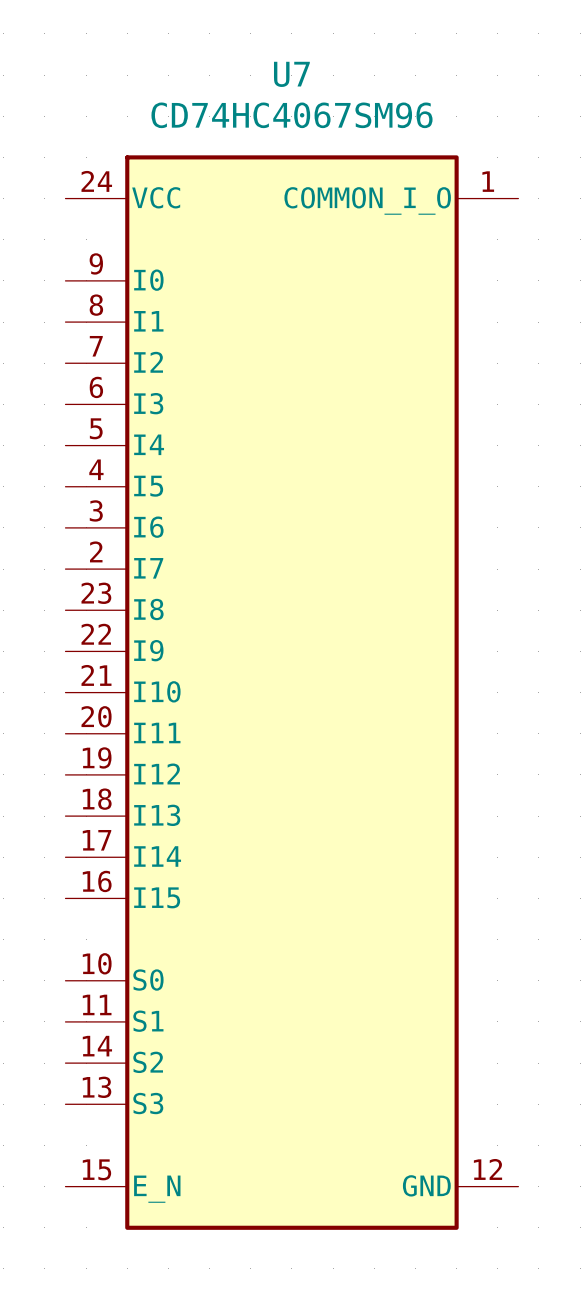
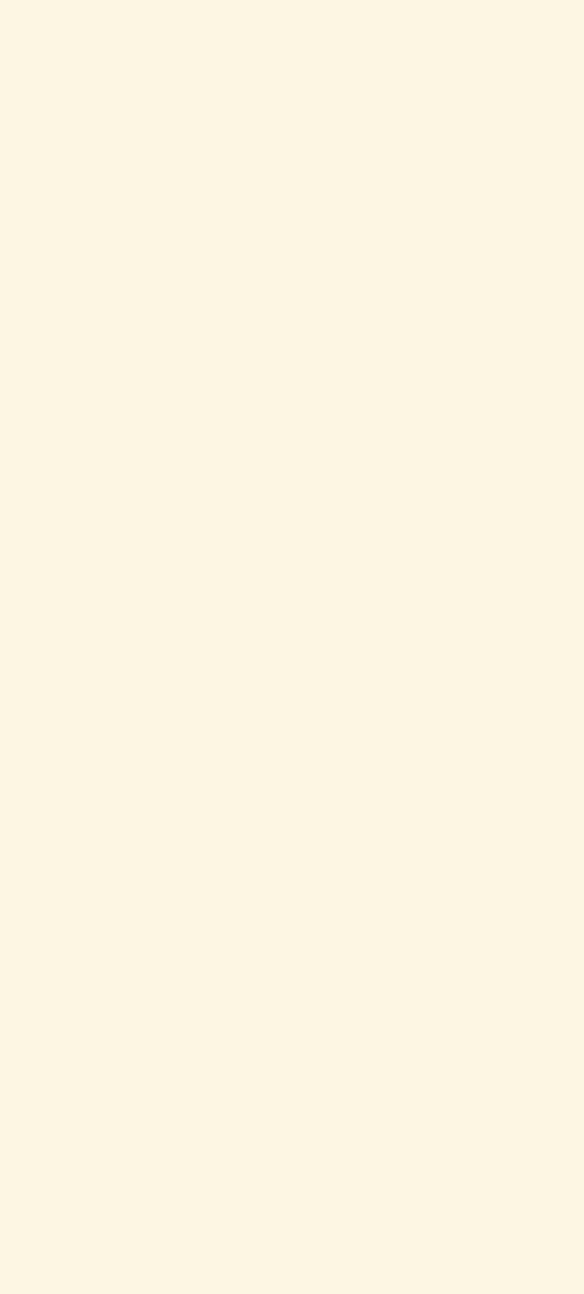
U7: CD74HC4067SM96 (291, 692) -> none

